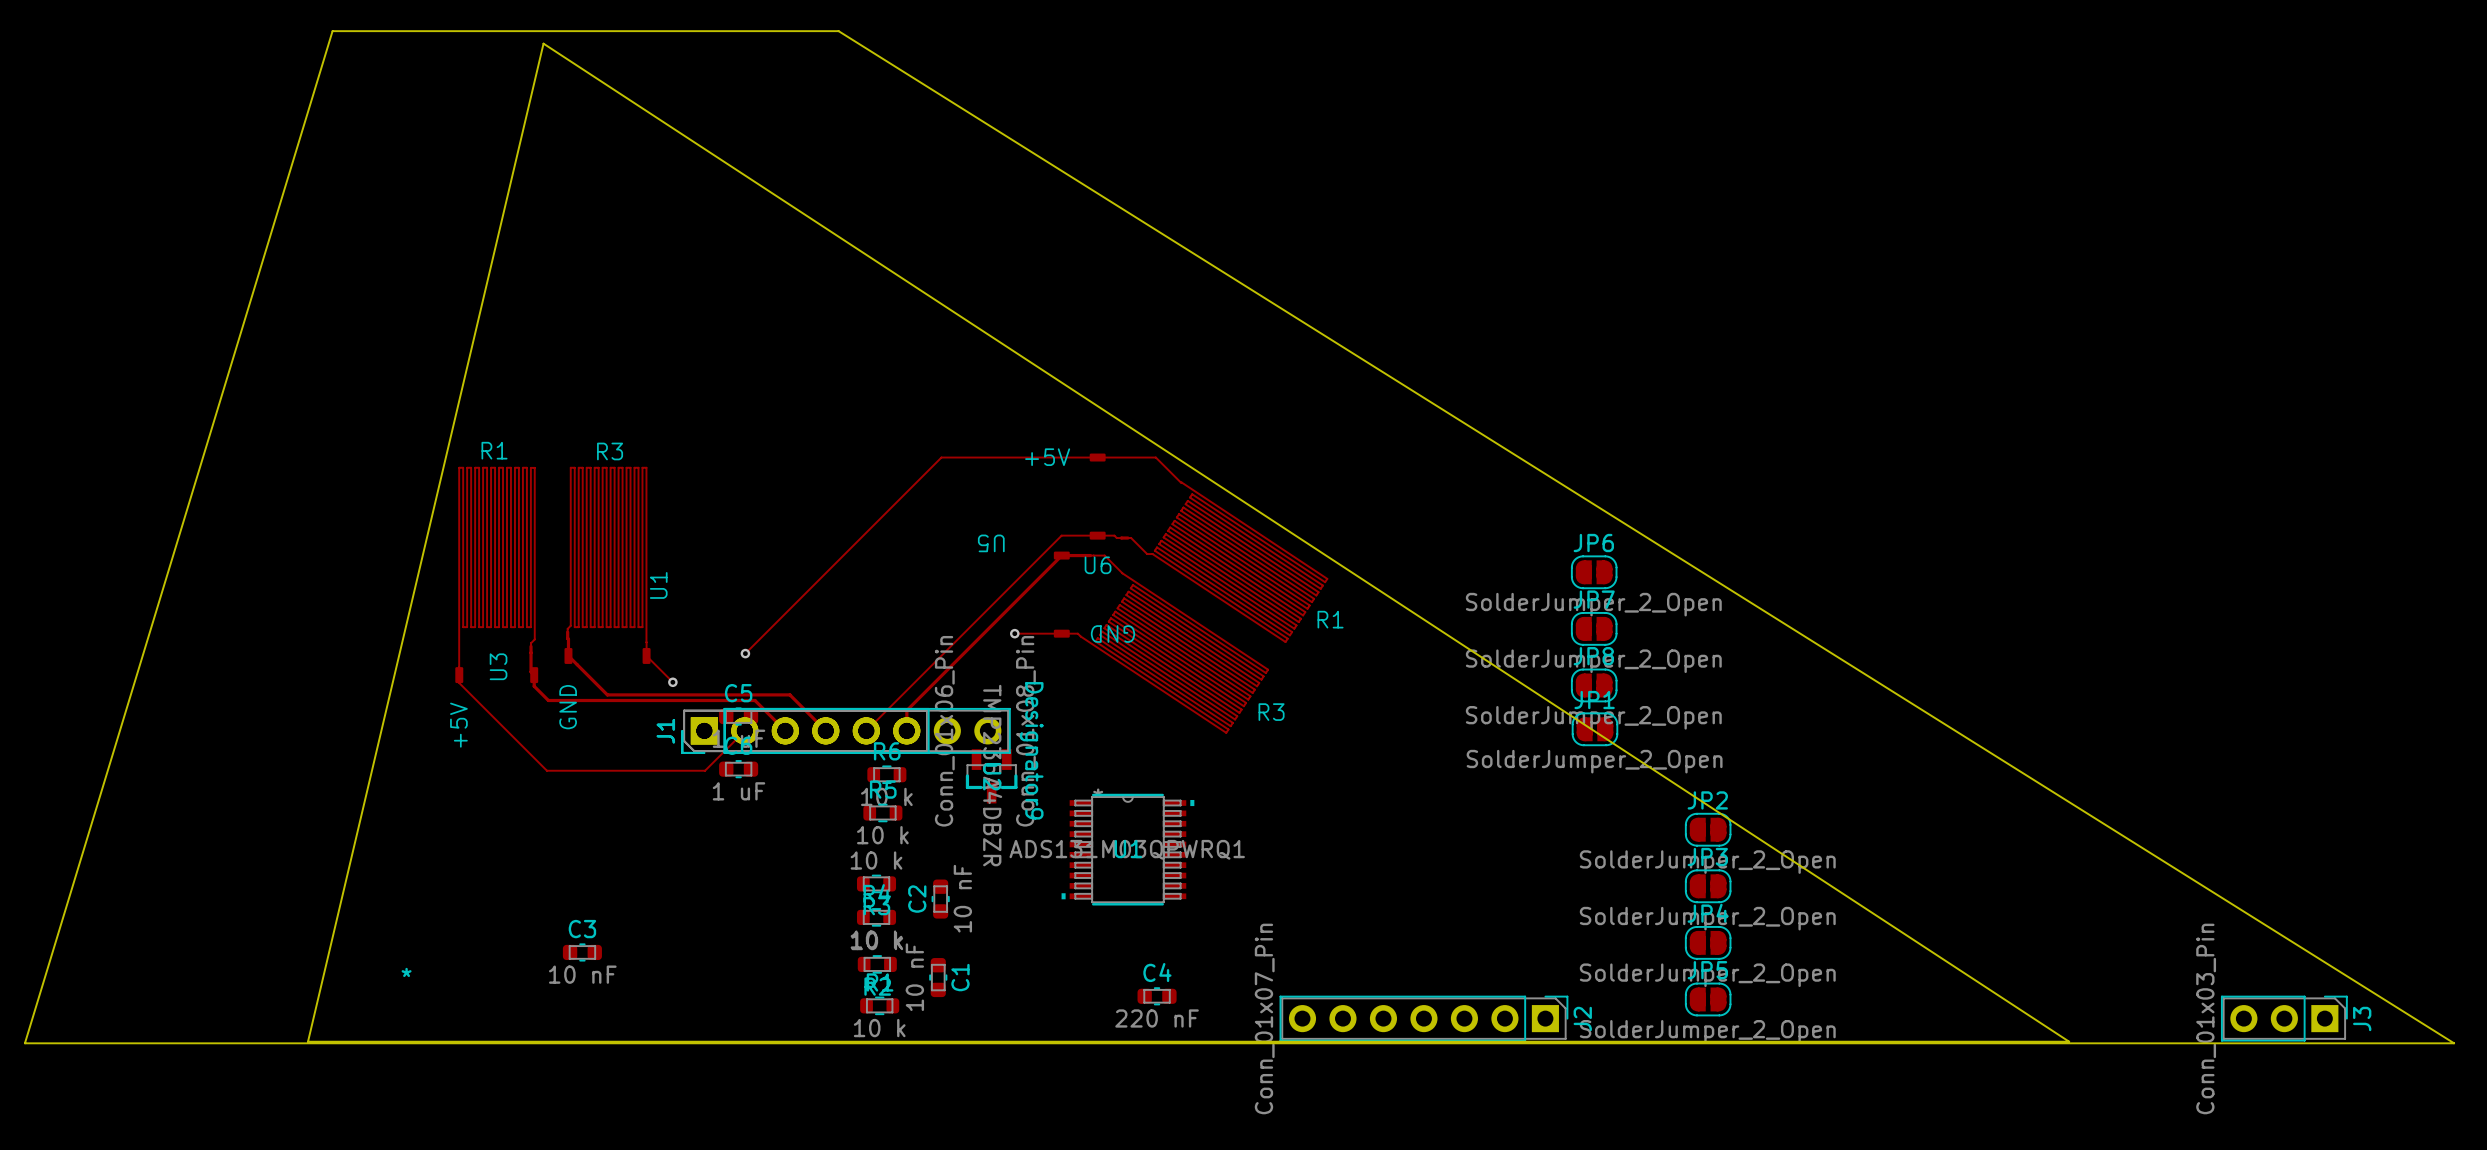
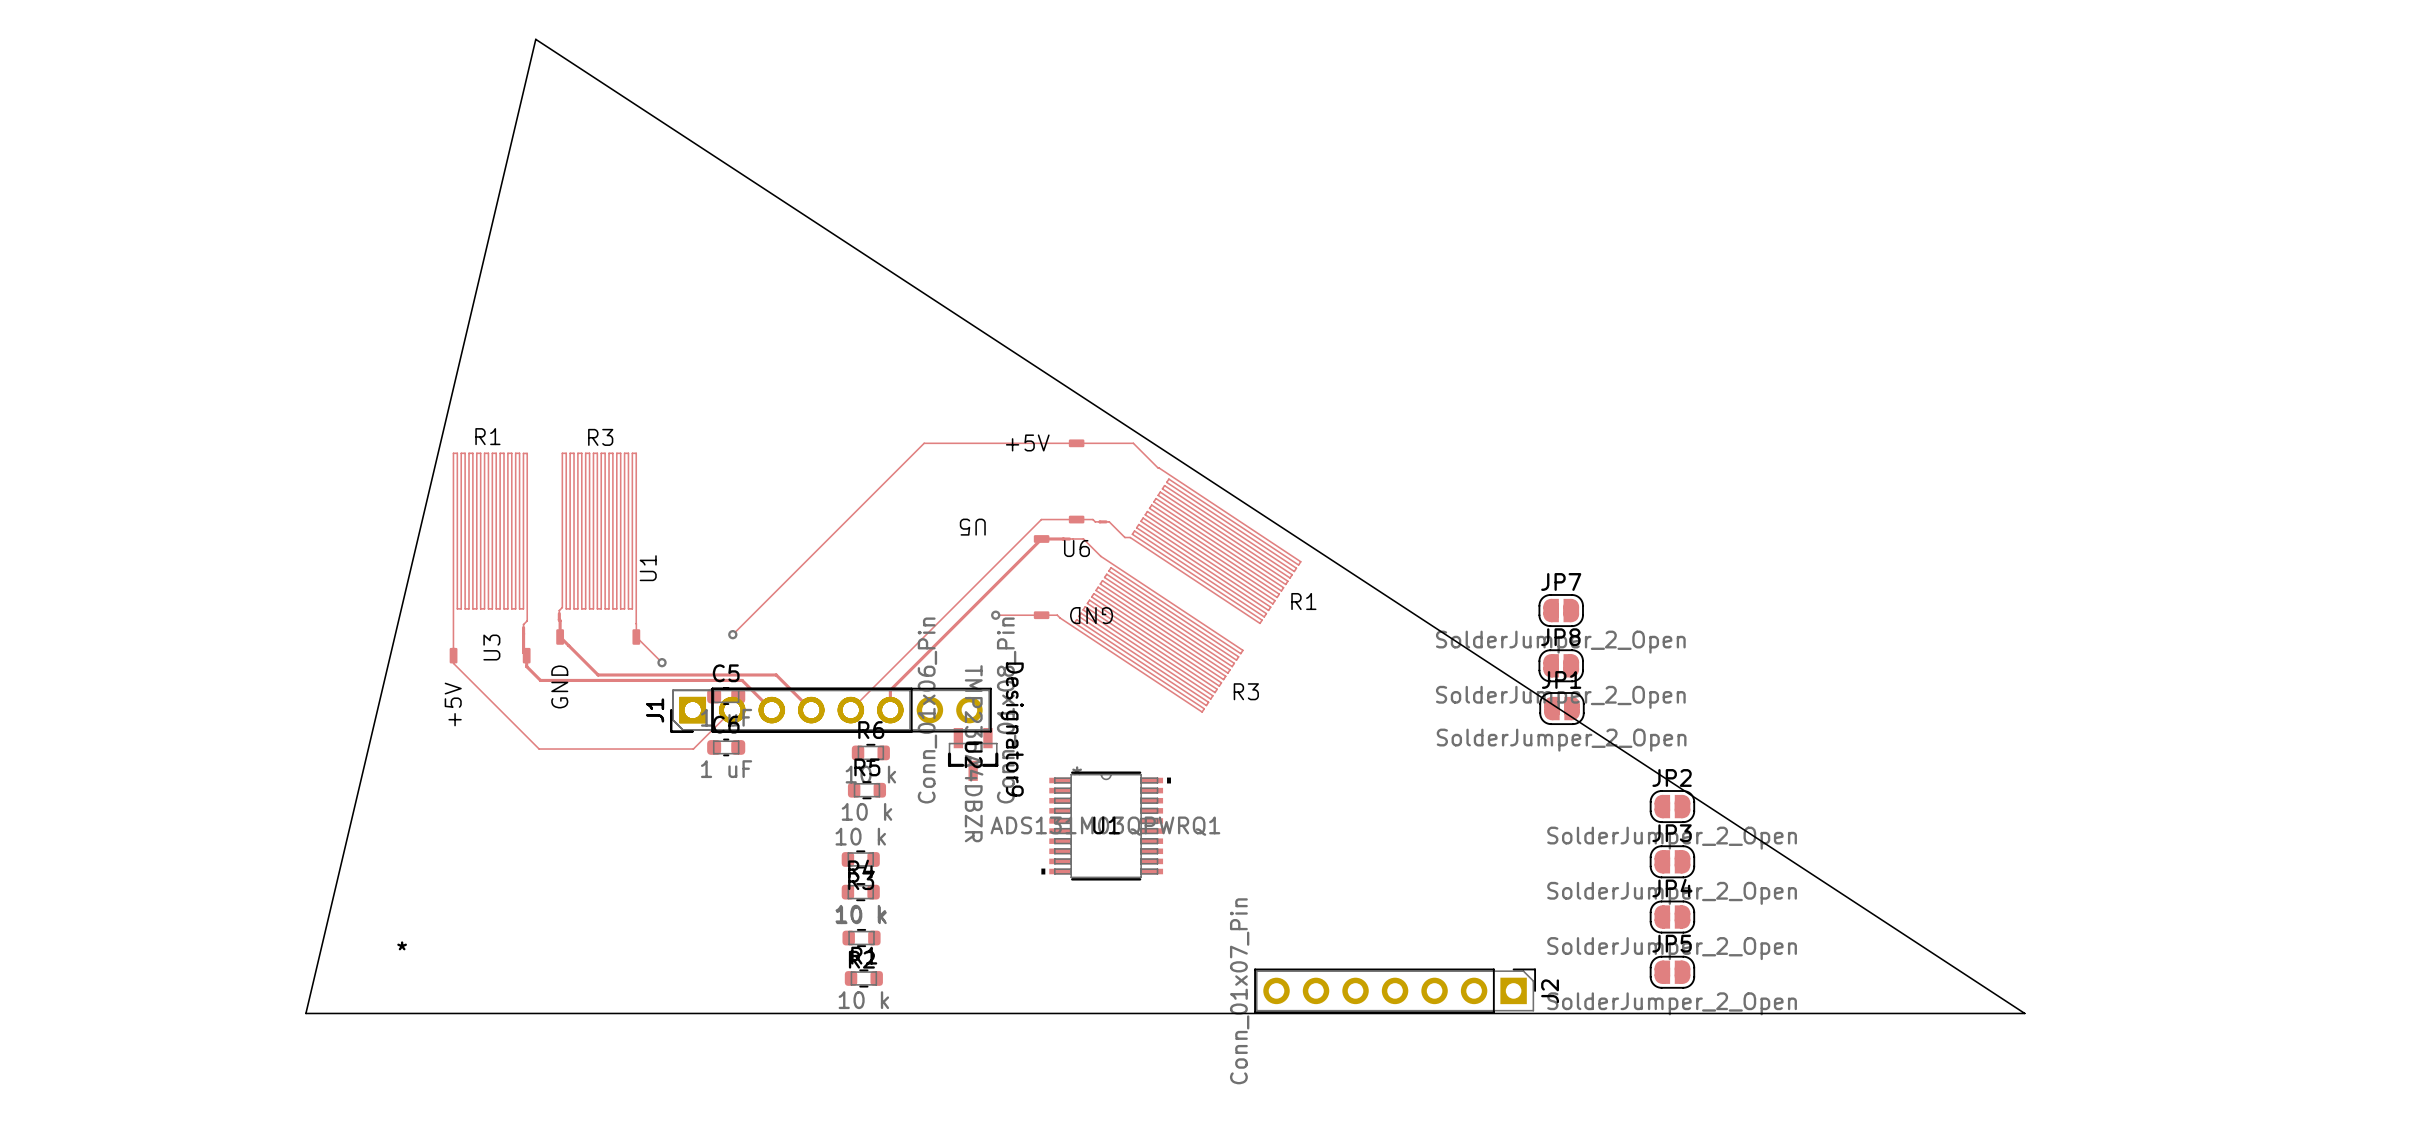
board edge: (332, 31) (838, 31) (2454, 1043) (24, 1043) (332, 31) -> none
JP6: SolderJumper_2_Open (1594, 572) -> none
C2: 10 nF (940, 899) -> none
C3: 10 nF (582, 952) -> none
C1: 10 nF (938, 977) -> none
C4: 220 nF (1157, 996) -> none
J3: Conn_01x03_Pin (2284, 1018) -> none

